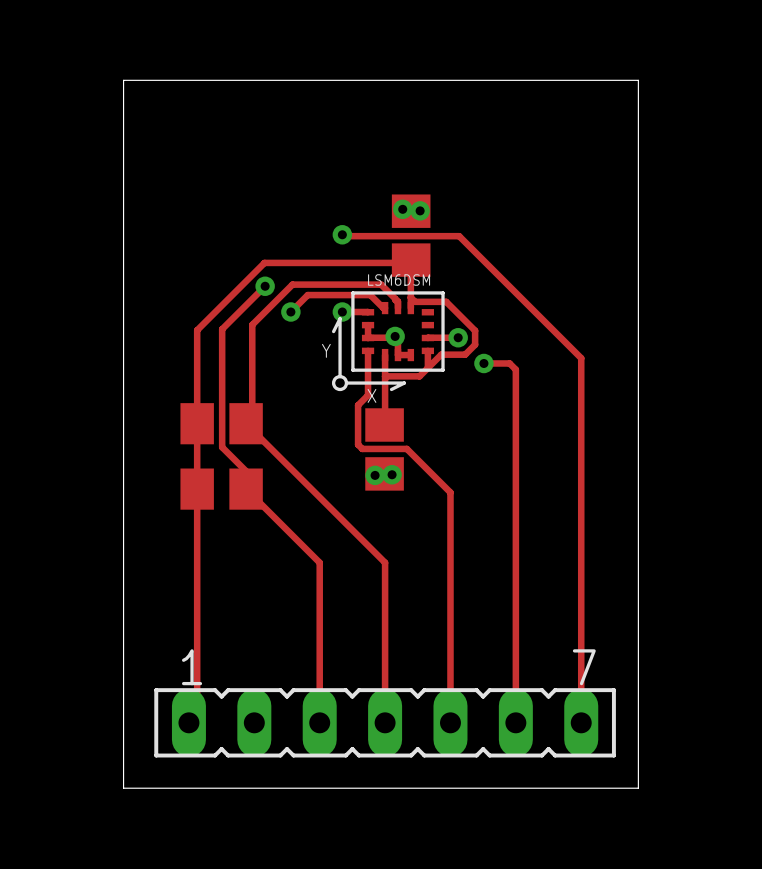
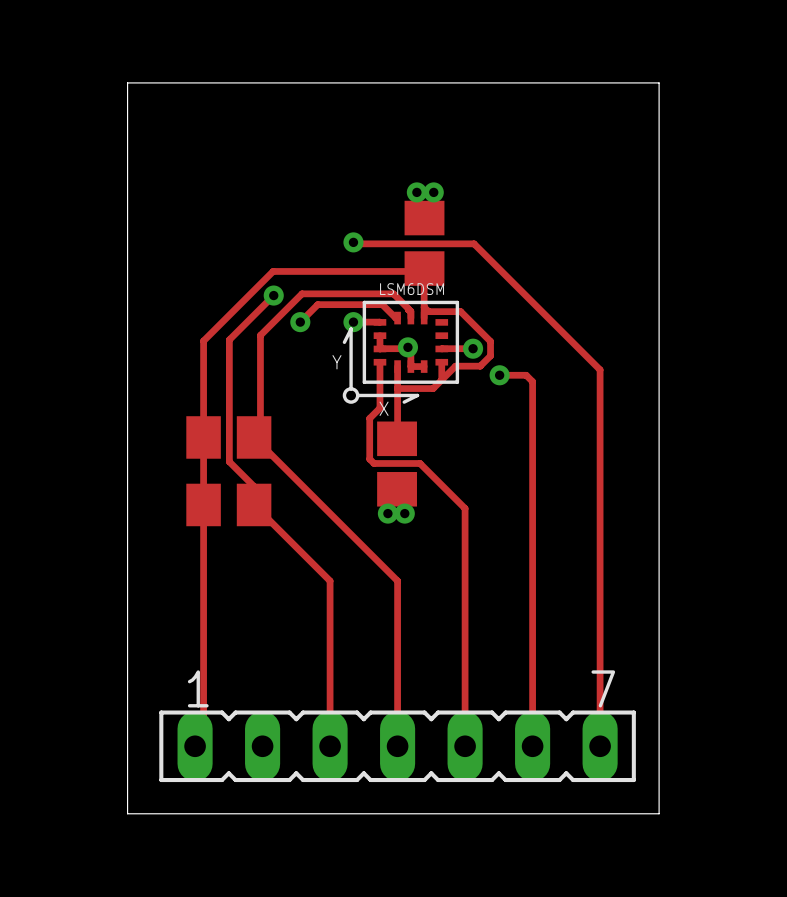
via: none -> (416, 192)
via: none -> (433, 192)
via: (402, 209) -> none
via: (420, 210) -> none
via: (392, 474) -> none
via: (375, 475) -> none
via: none -> (387, 513)
via: none -> (404, 513)

